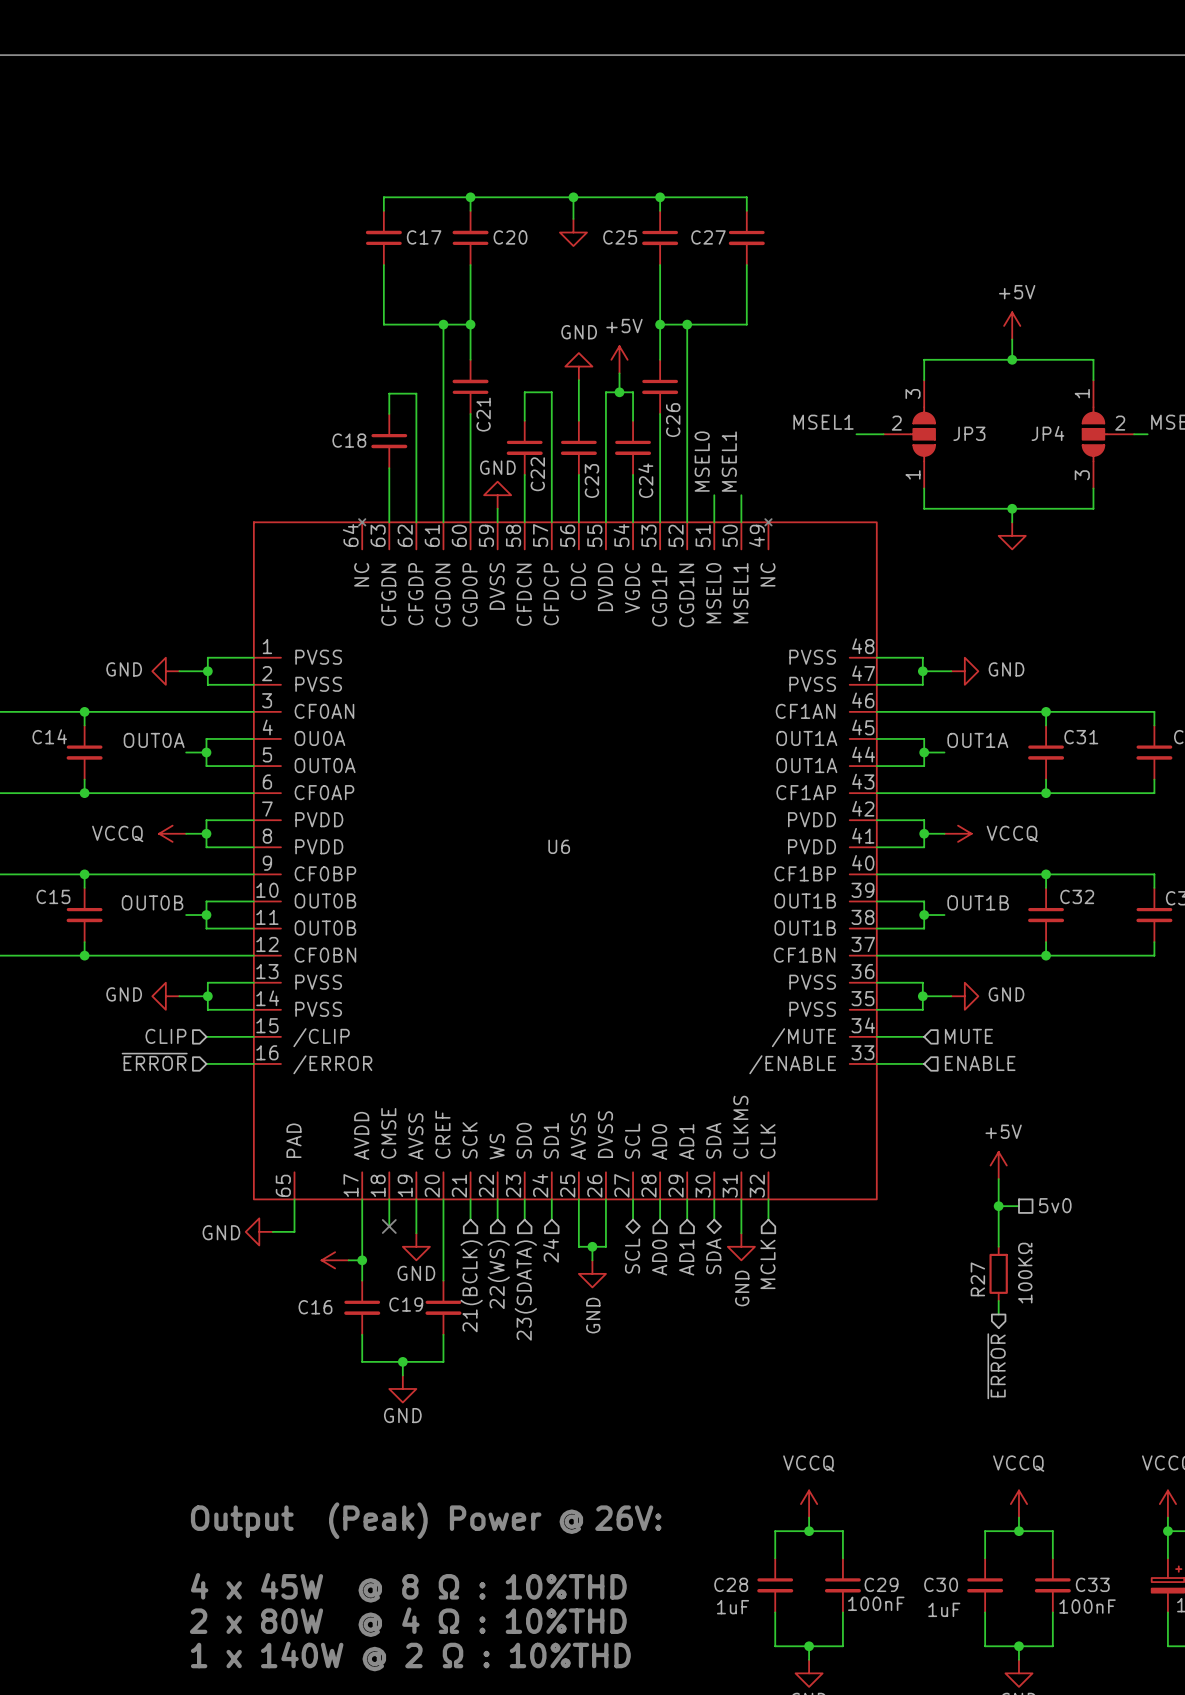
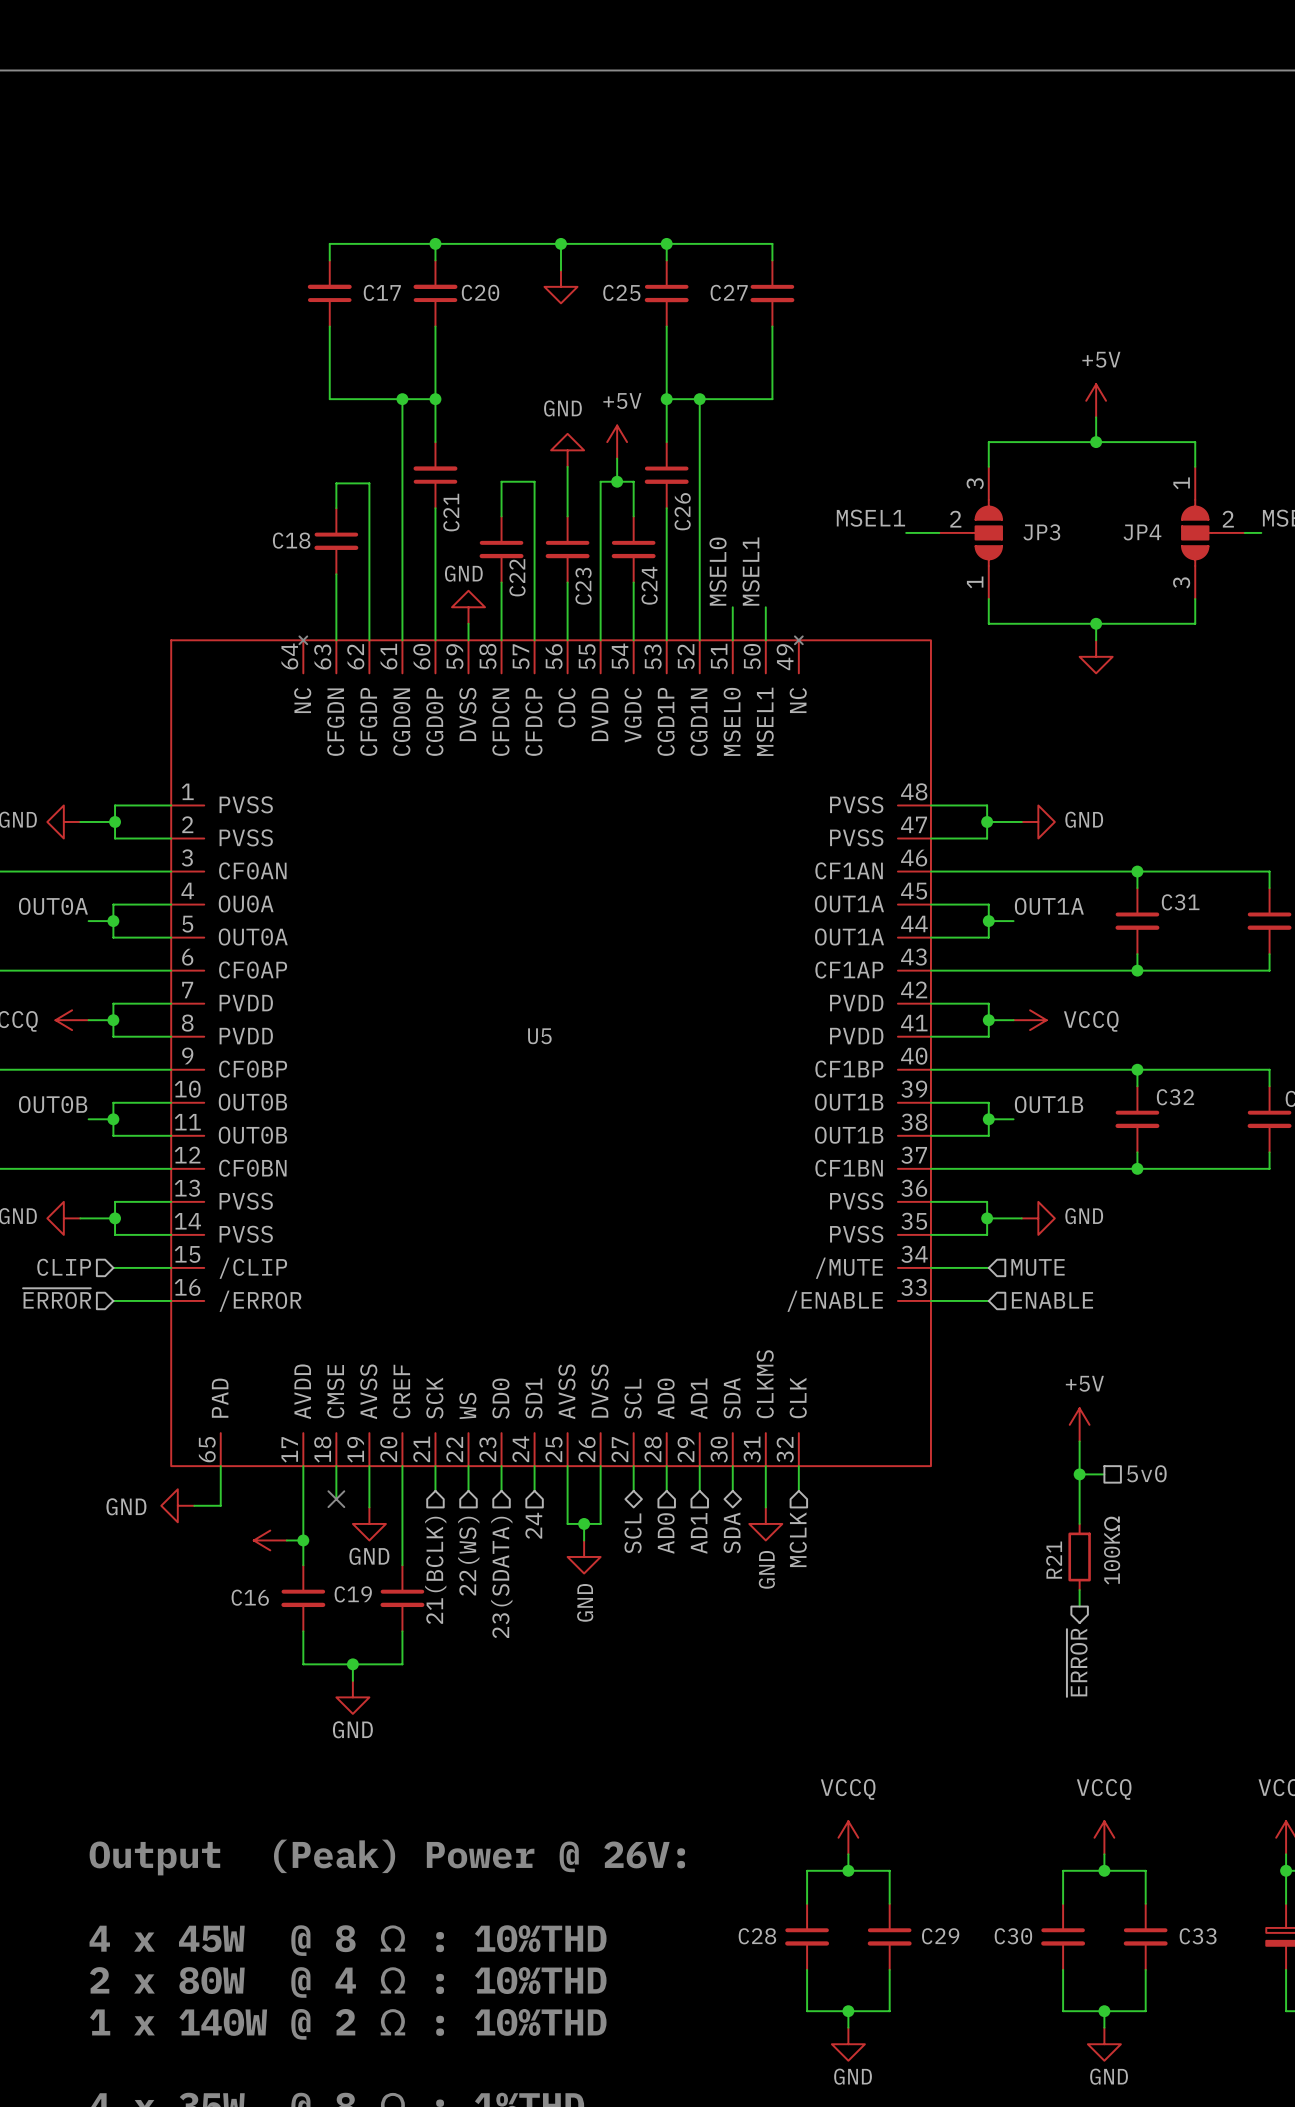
U6 name: U6 (559, 846) -> U5 (539, 1036)
R27 name: R27 (977, 1279) -> R21 (1054, 1560)
C29 value: 100nF (876, 1603) -> none
C33 value: 100nF (1087, 1606) -> none
C28 value: 1uF (733, 1607) -> none
C30 value: 1uF (944, 1609) -> none

